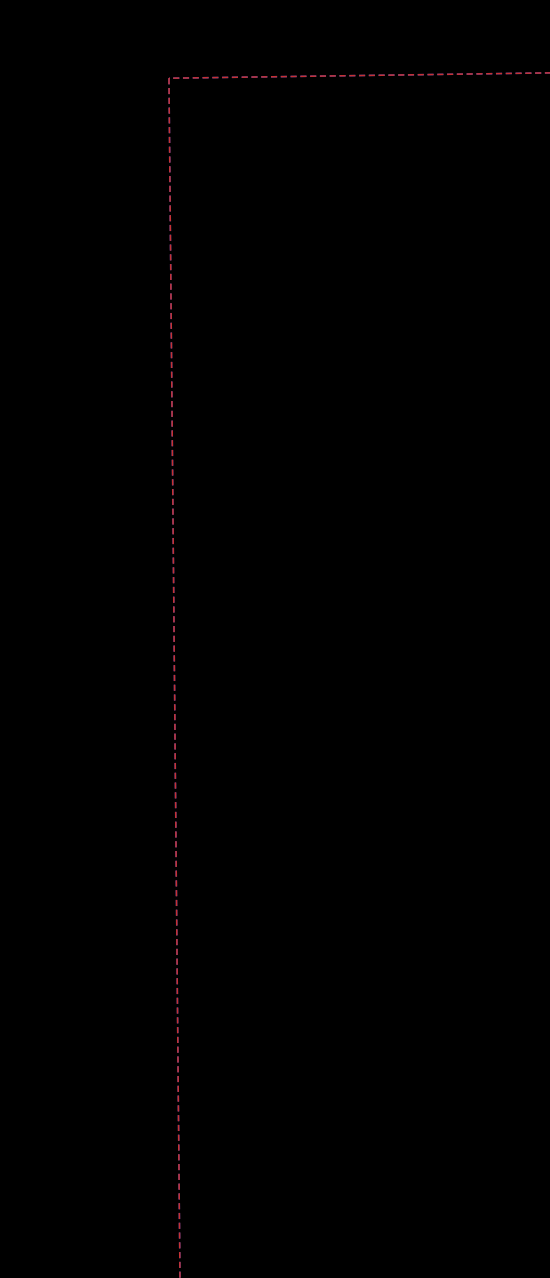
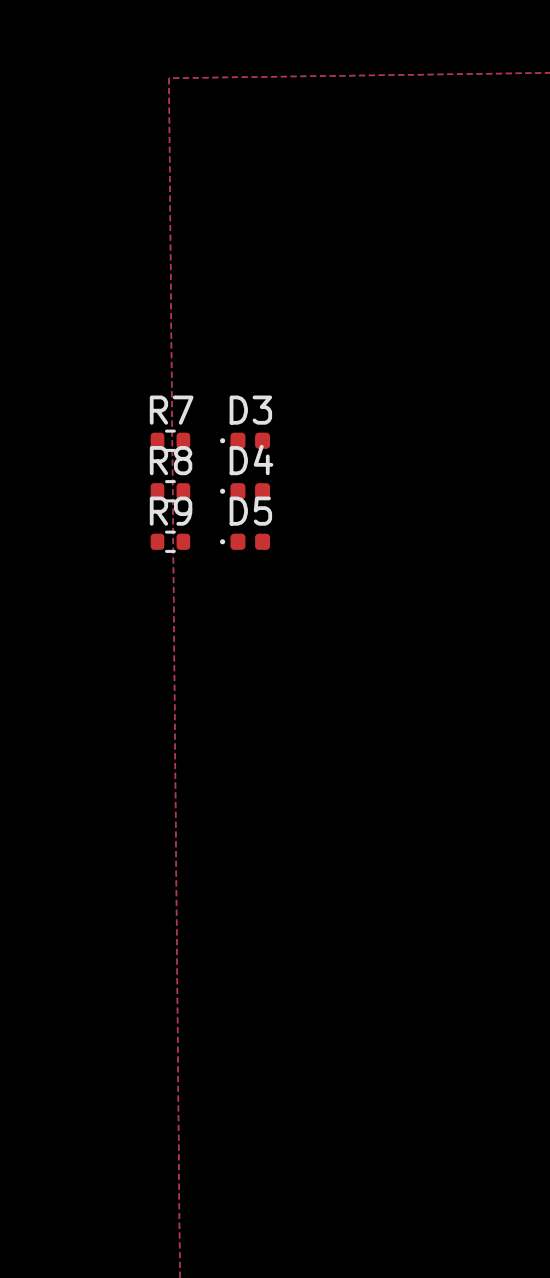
R7: none -> (170, 440)
D3: none -> (245, 440)
R8: none -> (170, 491)
D4: none -> (245, 491)
R9: none -> (170, 541)
D5: none -> (245, 541)

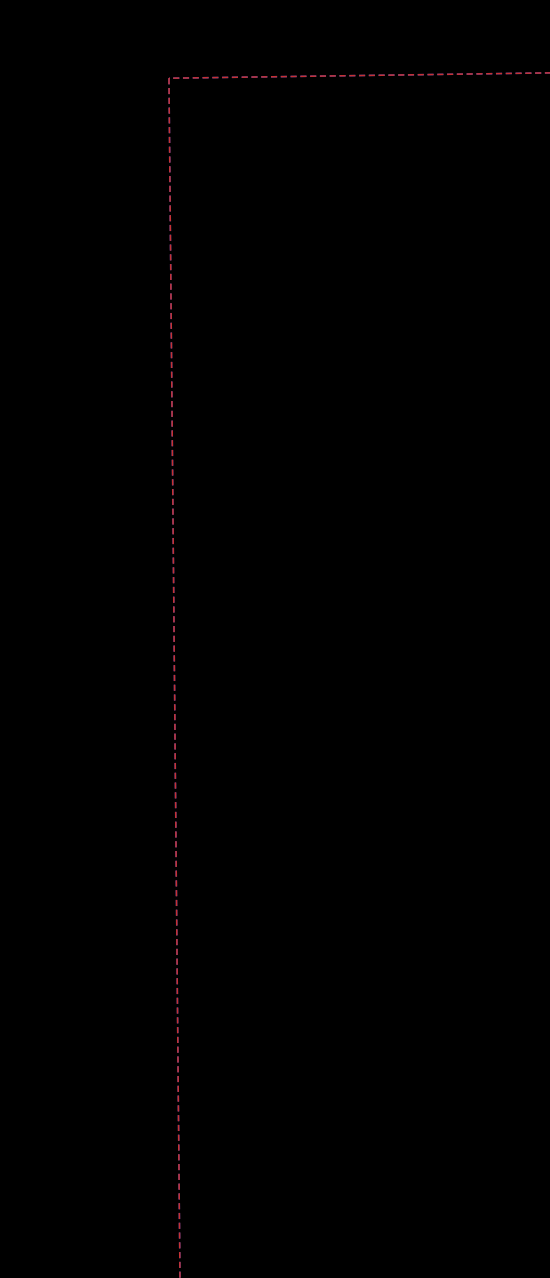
R7: (170, 440) -> none
D3: (245, 440) -> none
R8: (170, 491) -> none
D4: (245, 491) -> none
R9: (170, 541) -> none
D5: (245, 541) -> none

